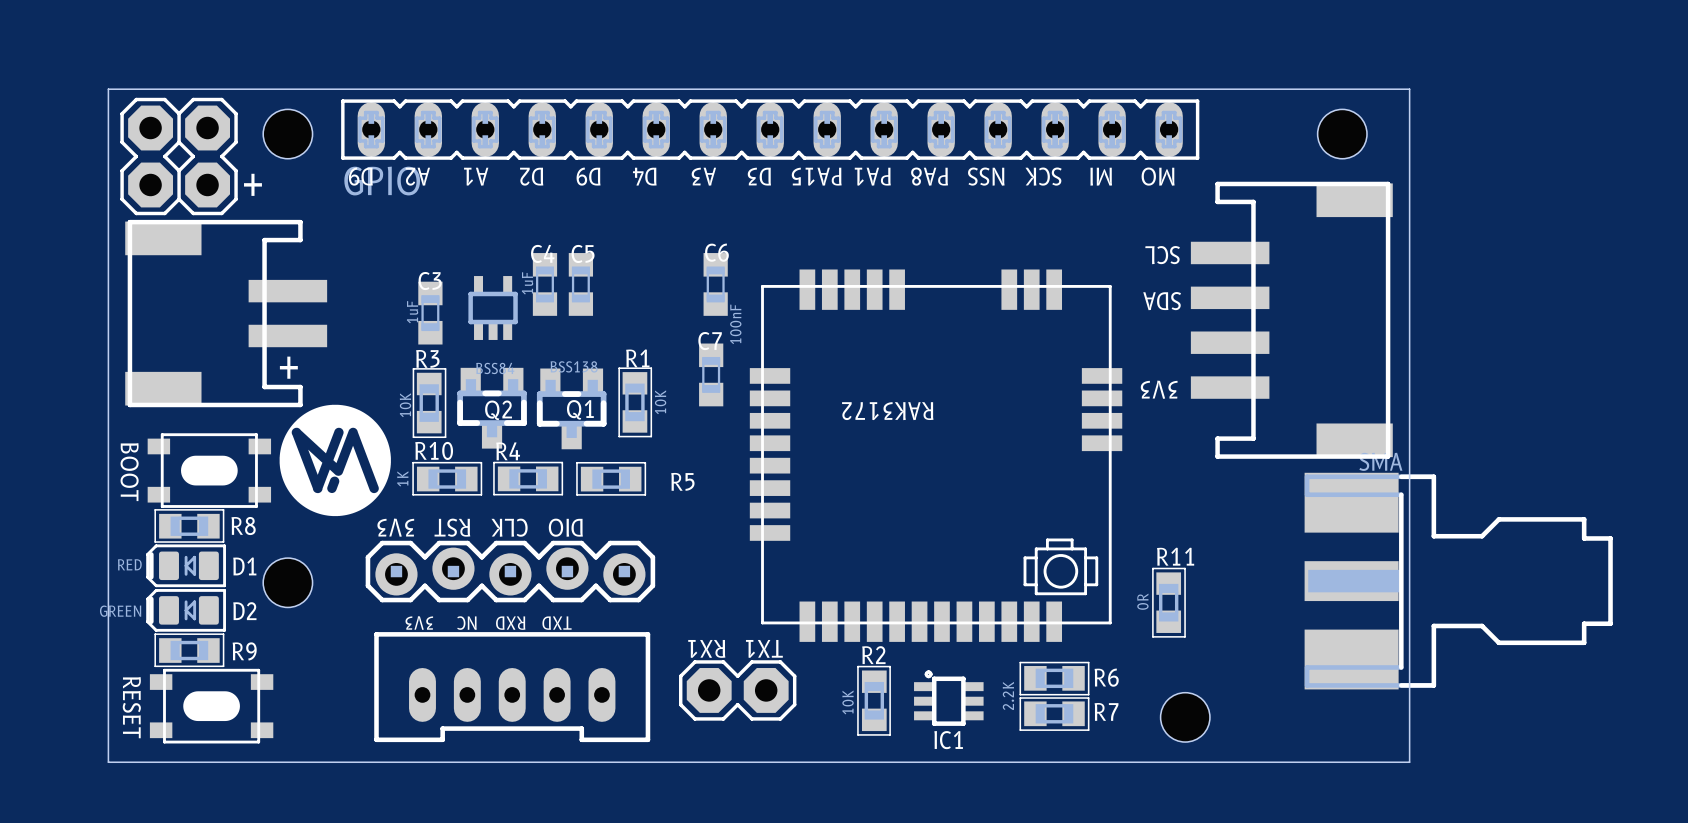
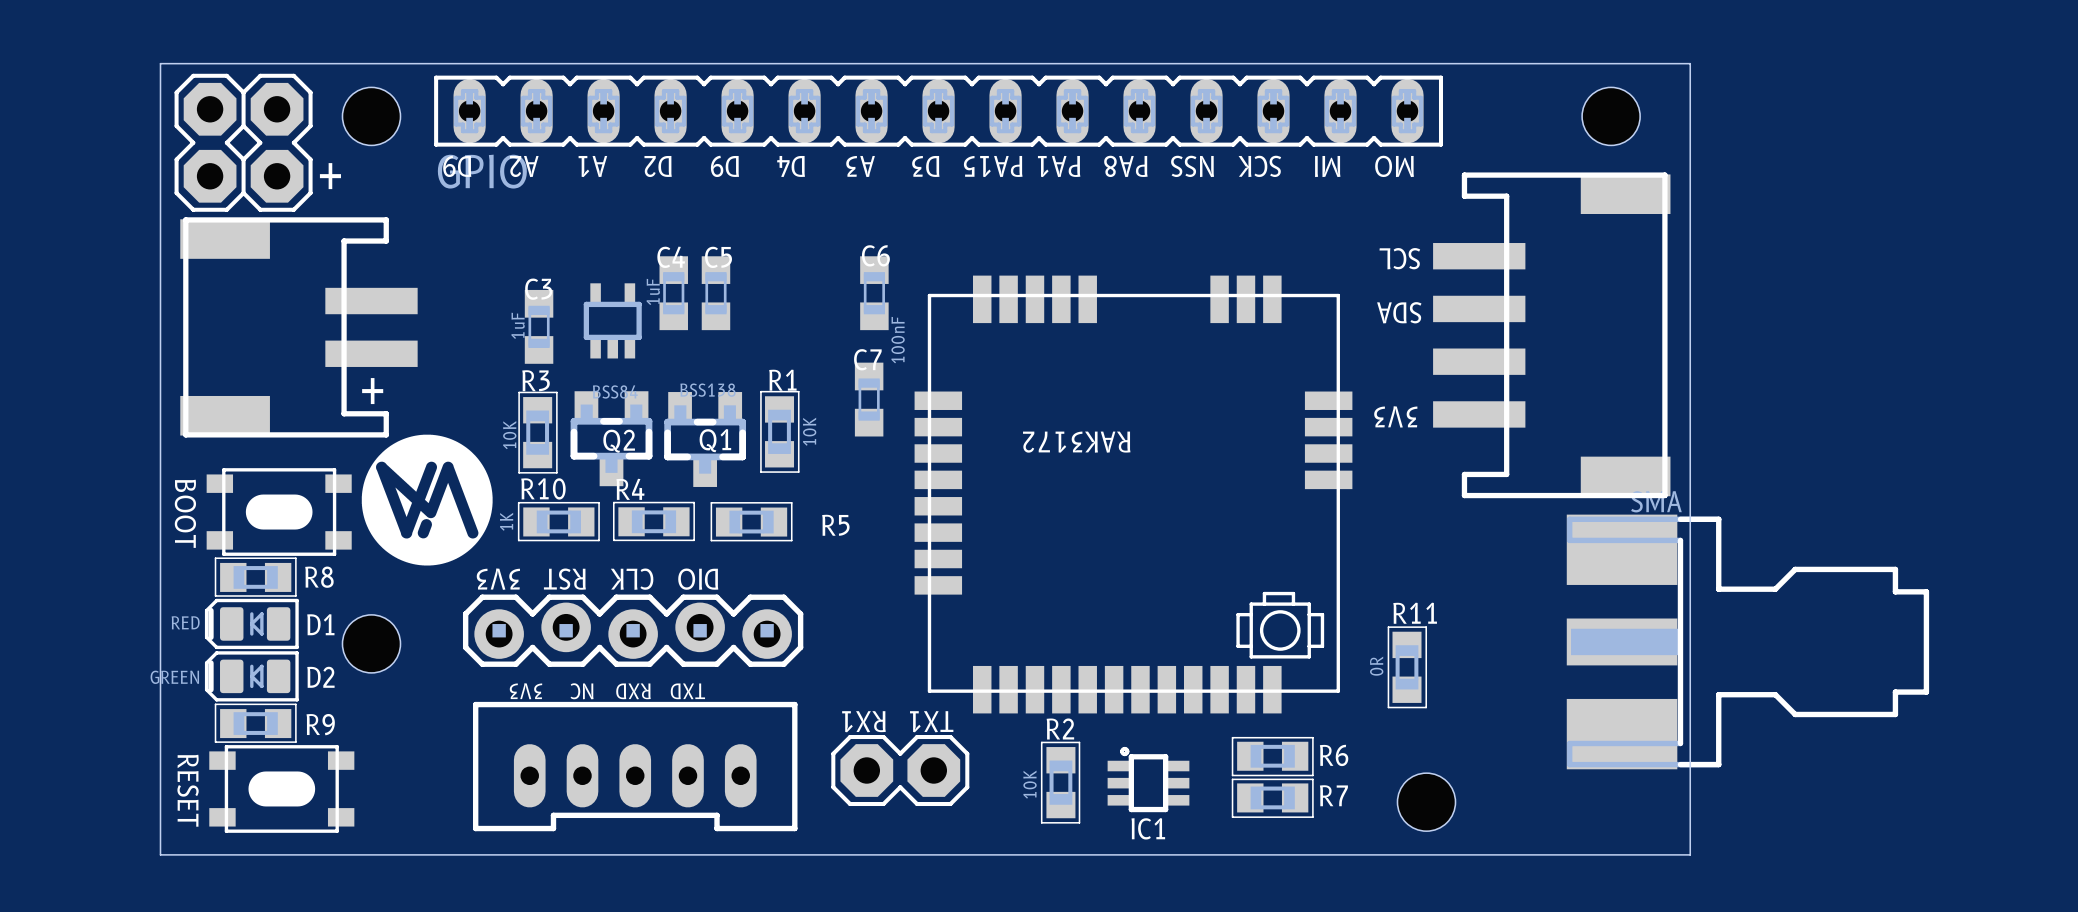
R6 value: 2.2K (1008, 695) -> none

